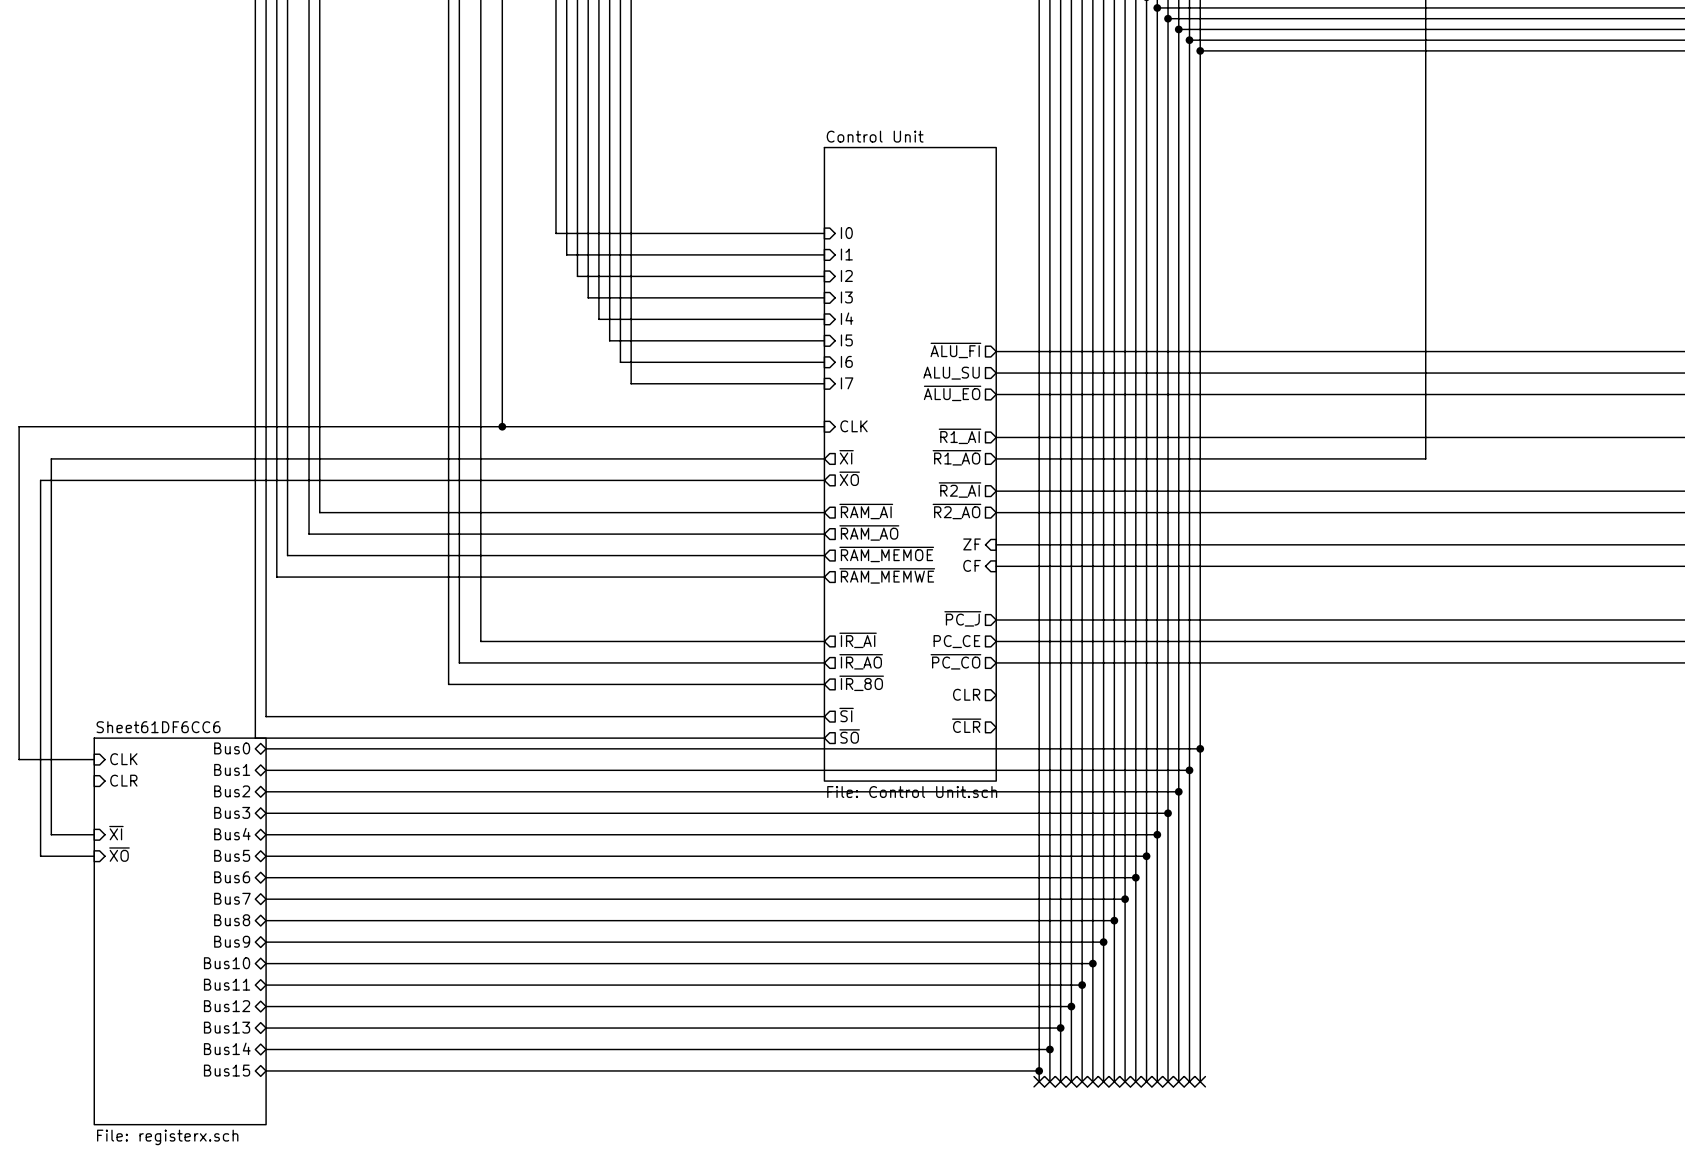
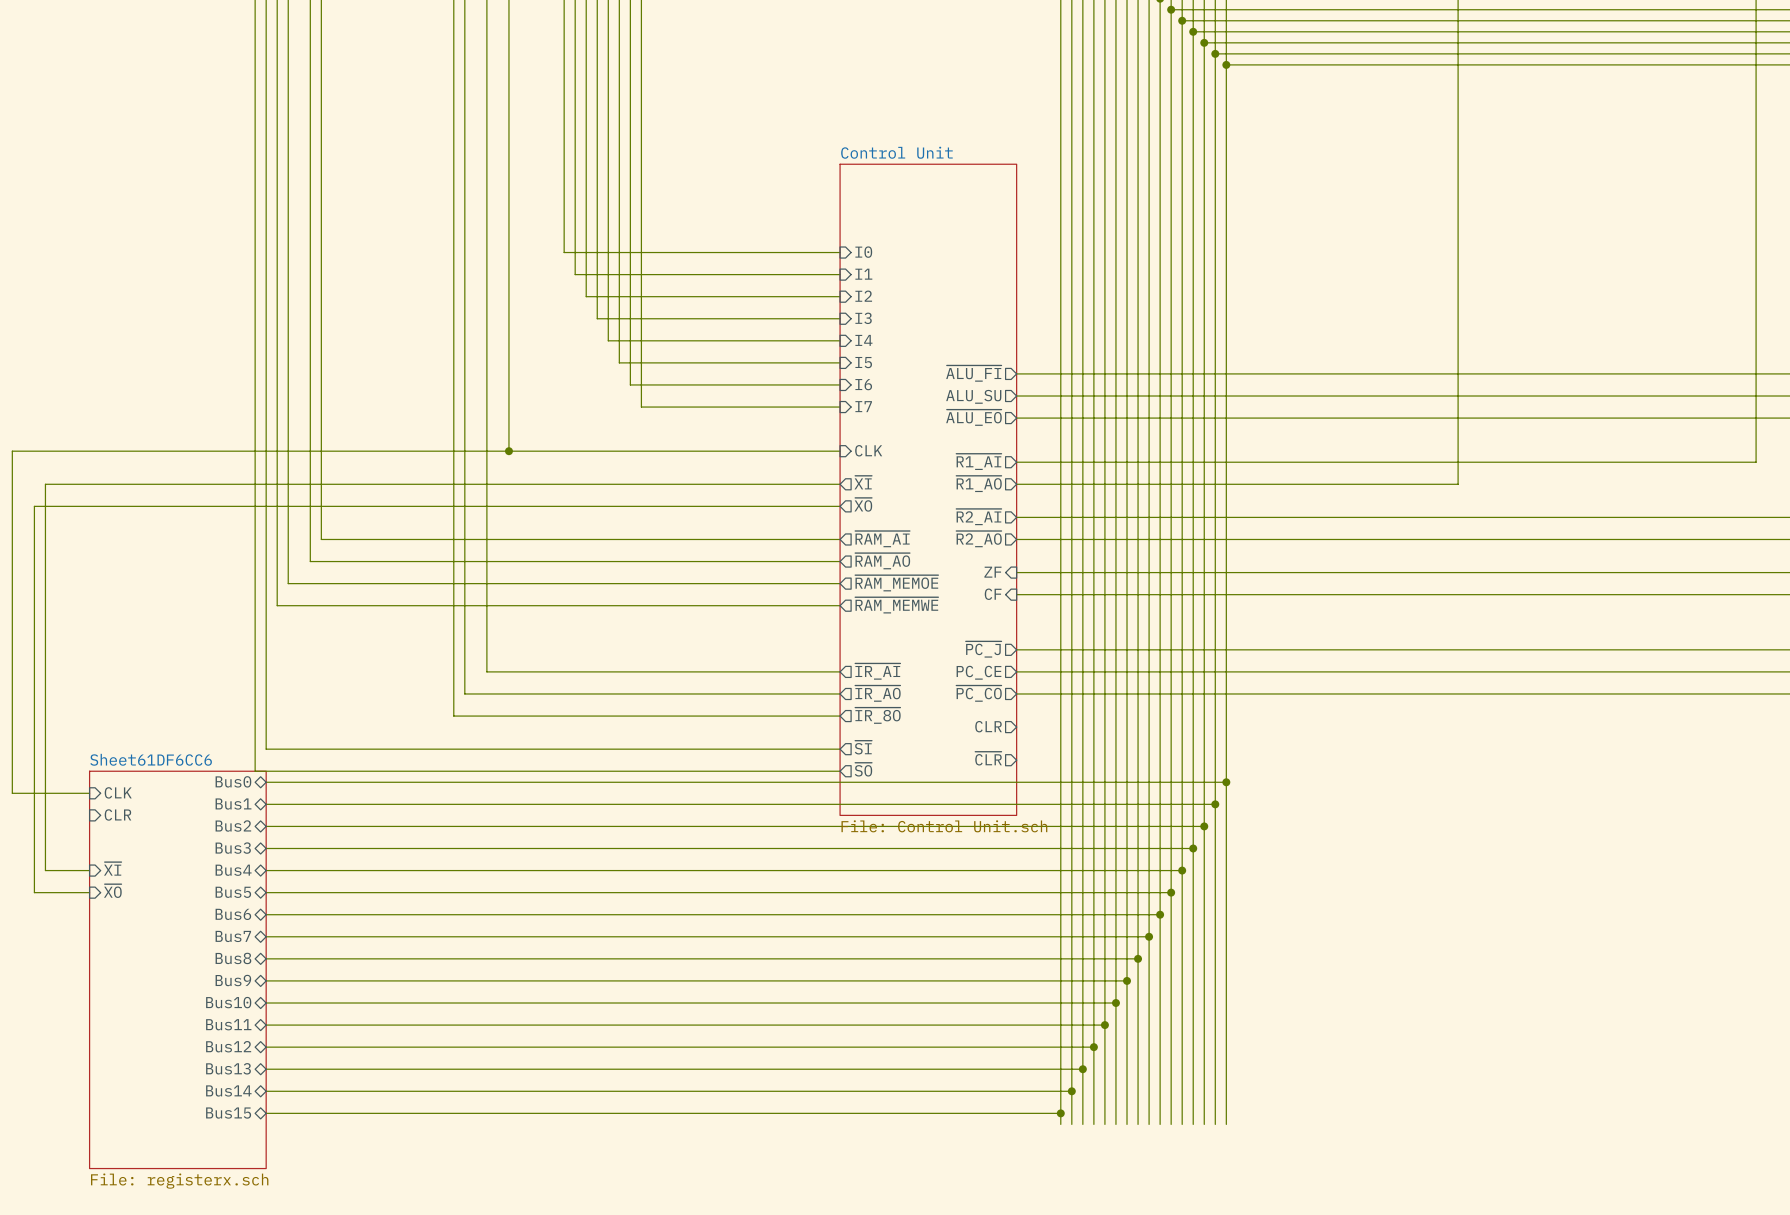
no-connect mark: (1039, 1081) -> none
no-connect mark: (1049, 1081) -> none
no-connect mark: (1060, 1081) -> none
no-connect mark: (1071, 1081) -> none
no-connect mark: (1082, 1081) -> none
no-connect mark: (1092, 1081) -> none
no-connect mark: (1103, 1081) -> none
no-connect mark: (1114, 1081) -> none
no-connect mark: (1125, 1081) -> none
no-connect mark: (1135, 1081) -> none
no-connect mark: (1146, 1081) -> none
no-connect mark: (1157, 1081) -> none
no-connect mark: (1168, 1081) -> none
no-connect mark: (1178, 1081) -> none
no-connect mark: (1189, 1081) -> none
no-connect mark: (1200, 1081) -> none

